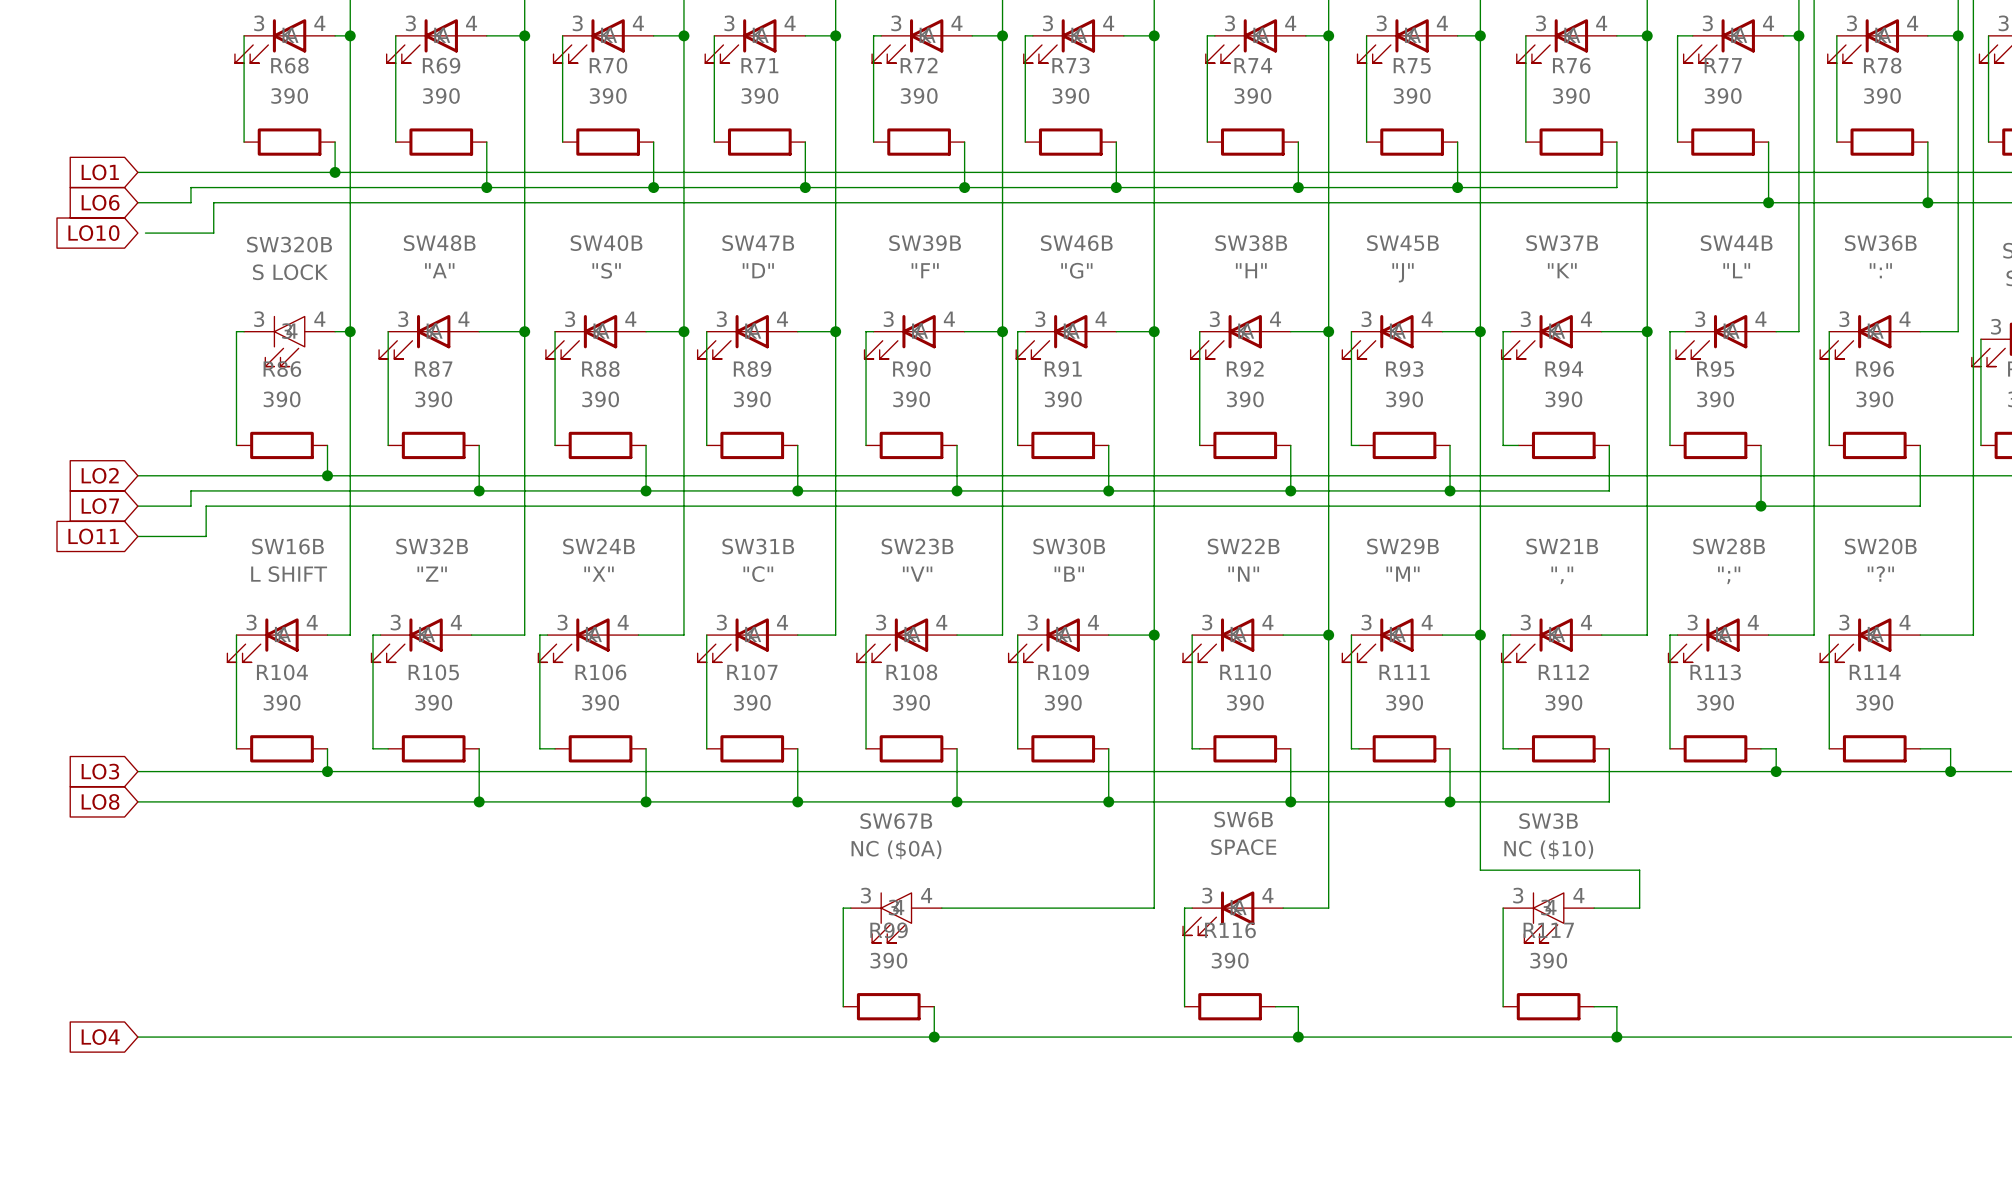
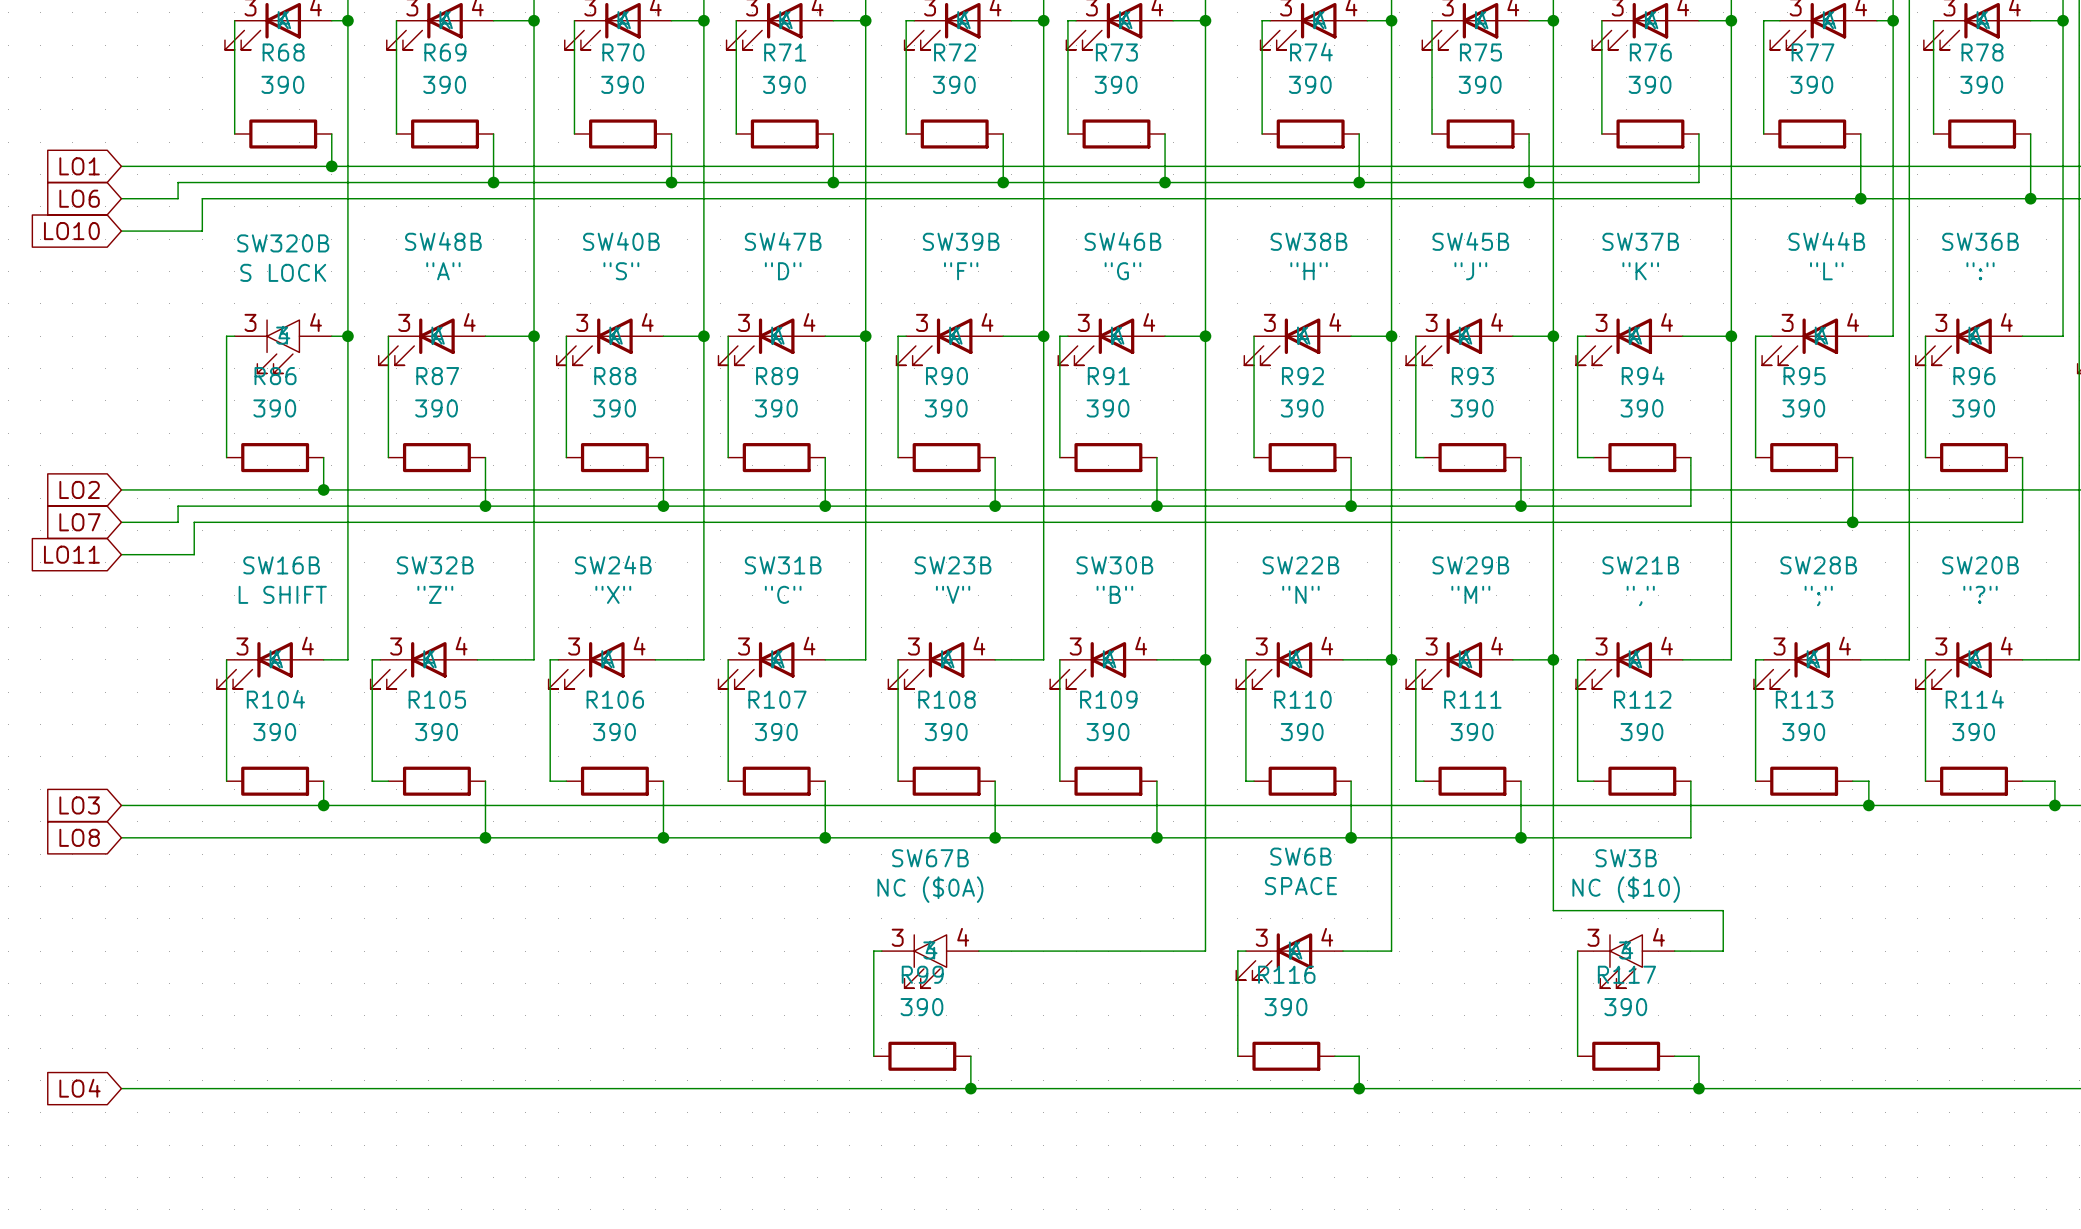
wire: none -> (121, 231) (129, 231)

